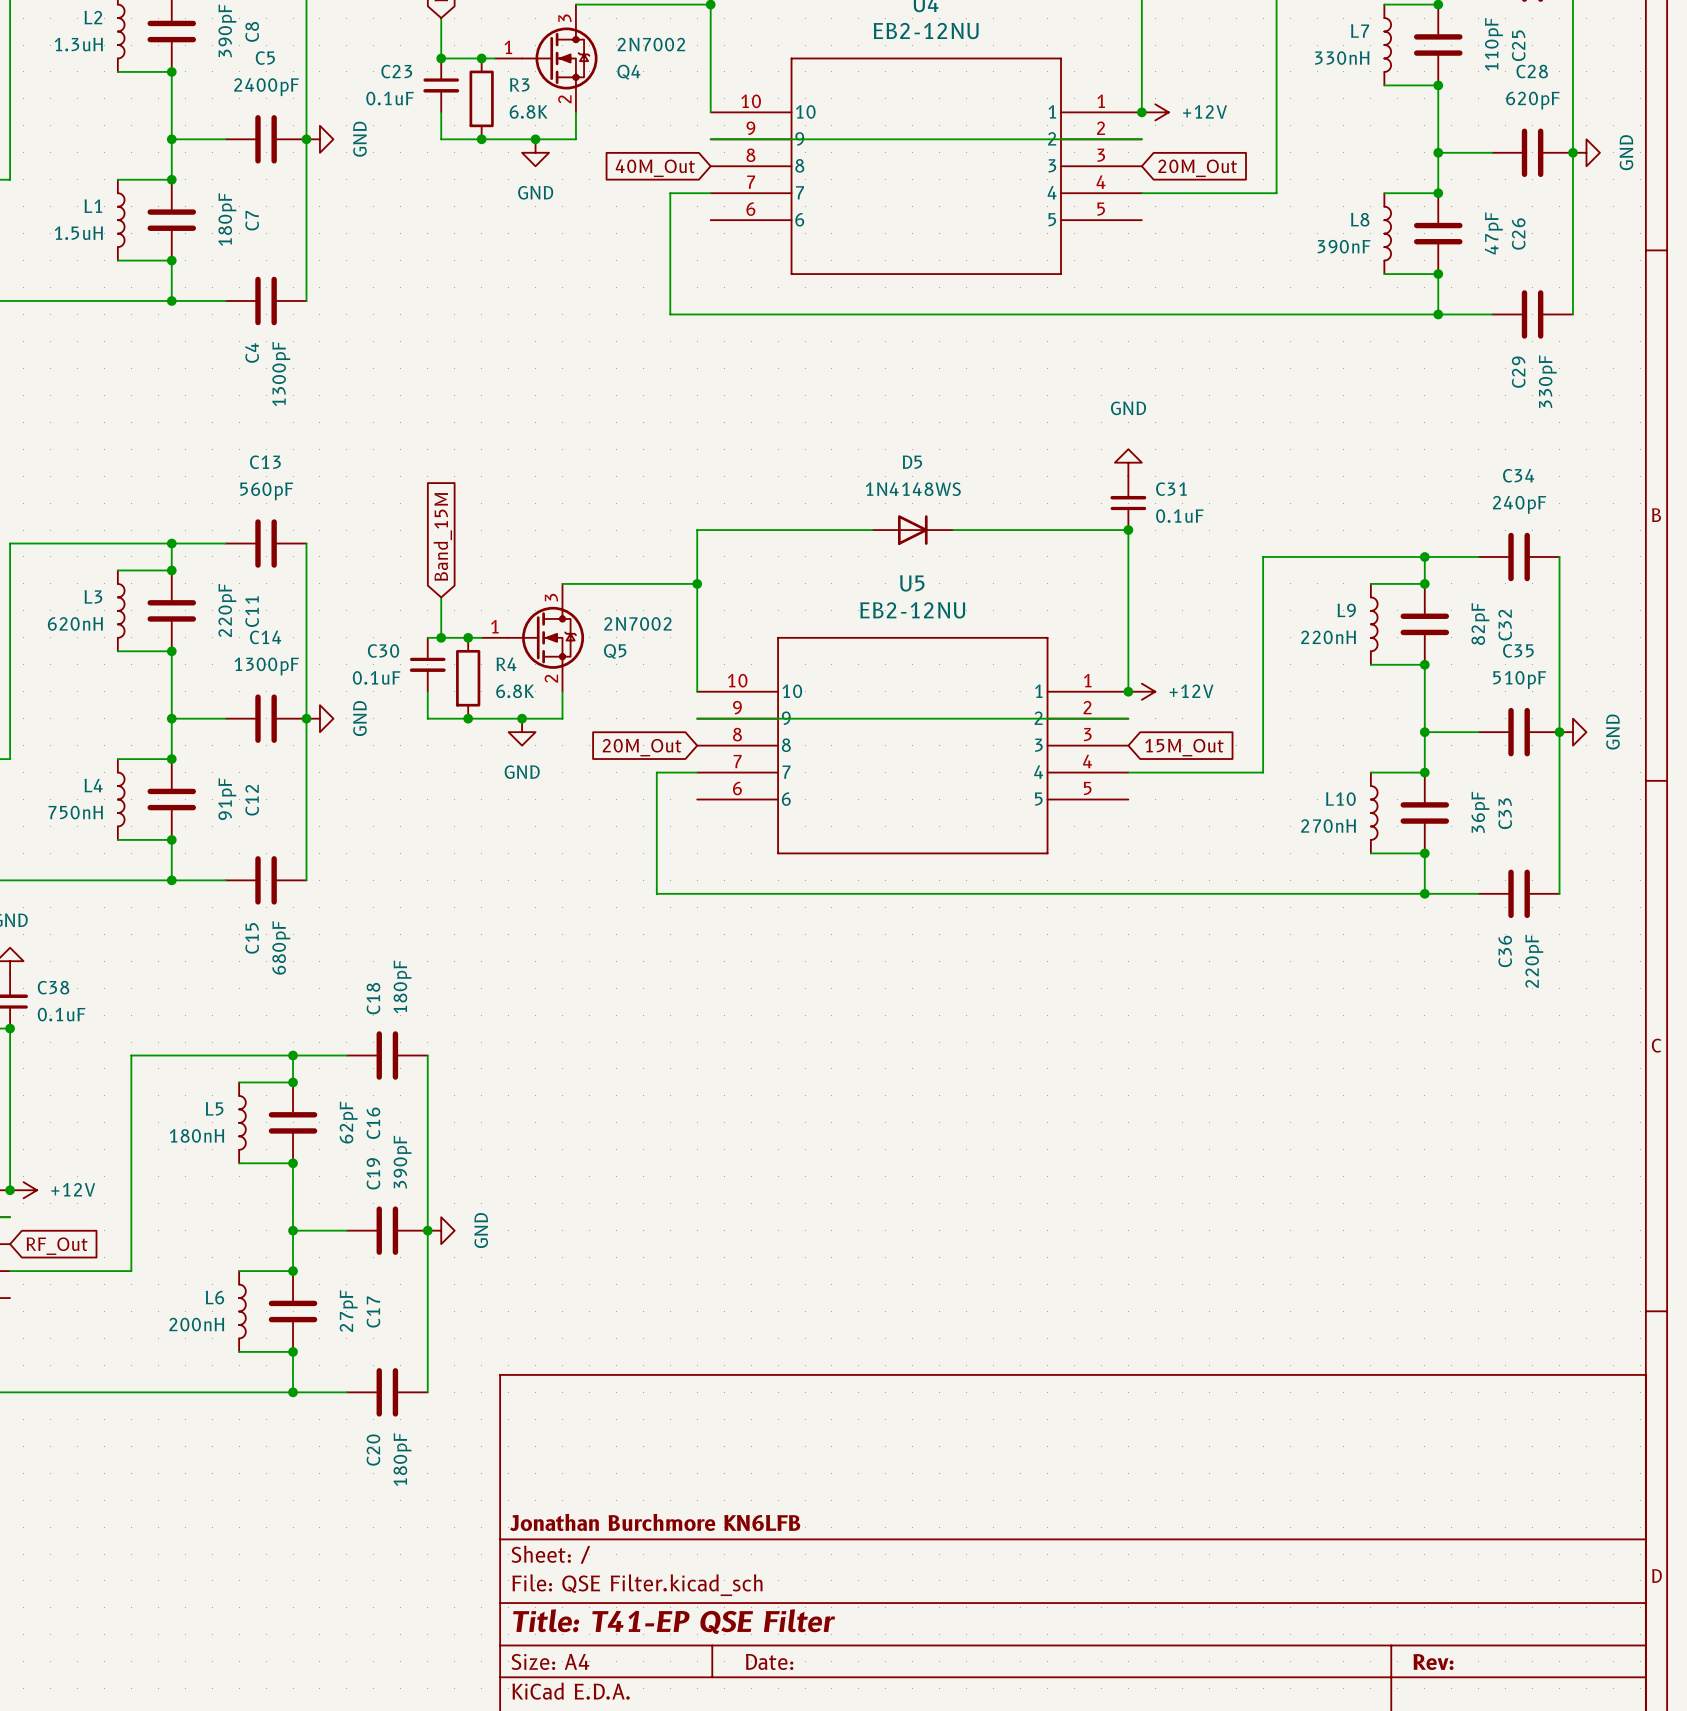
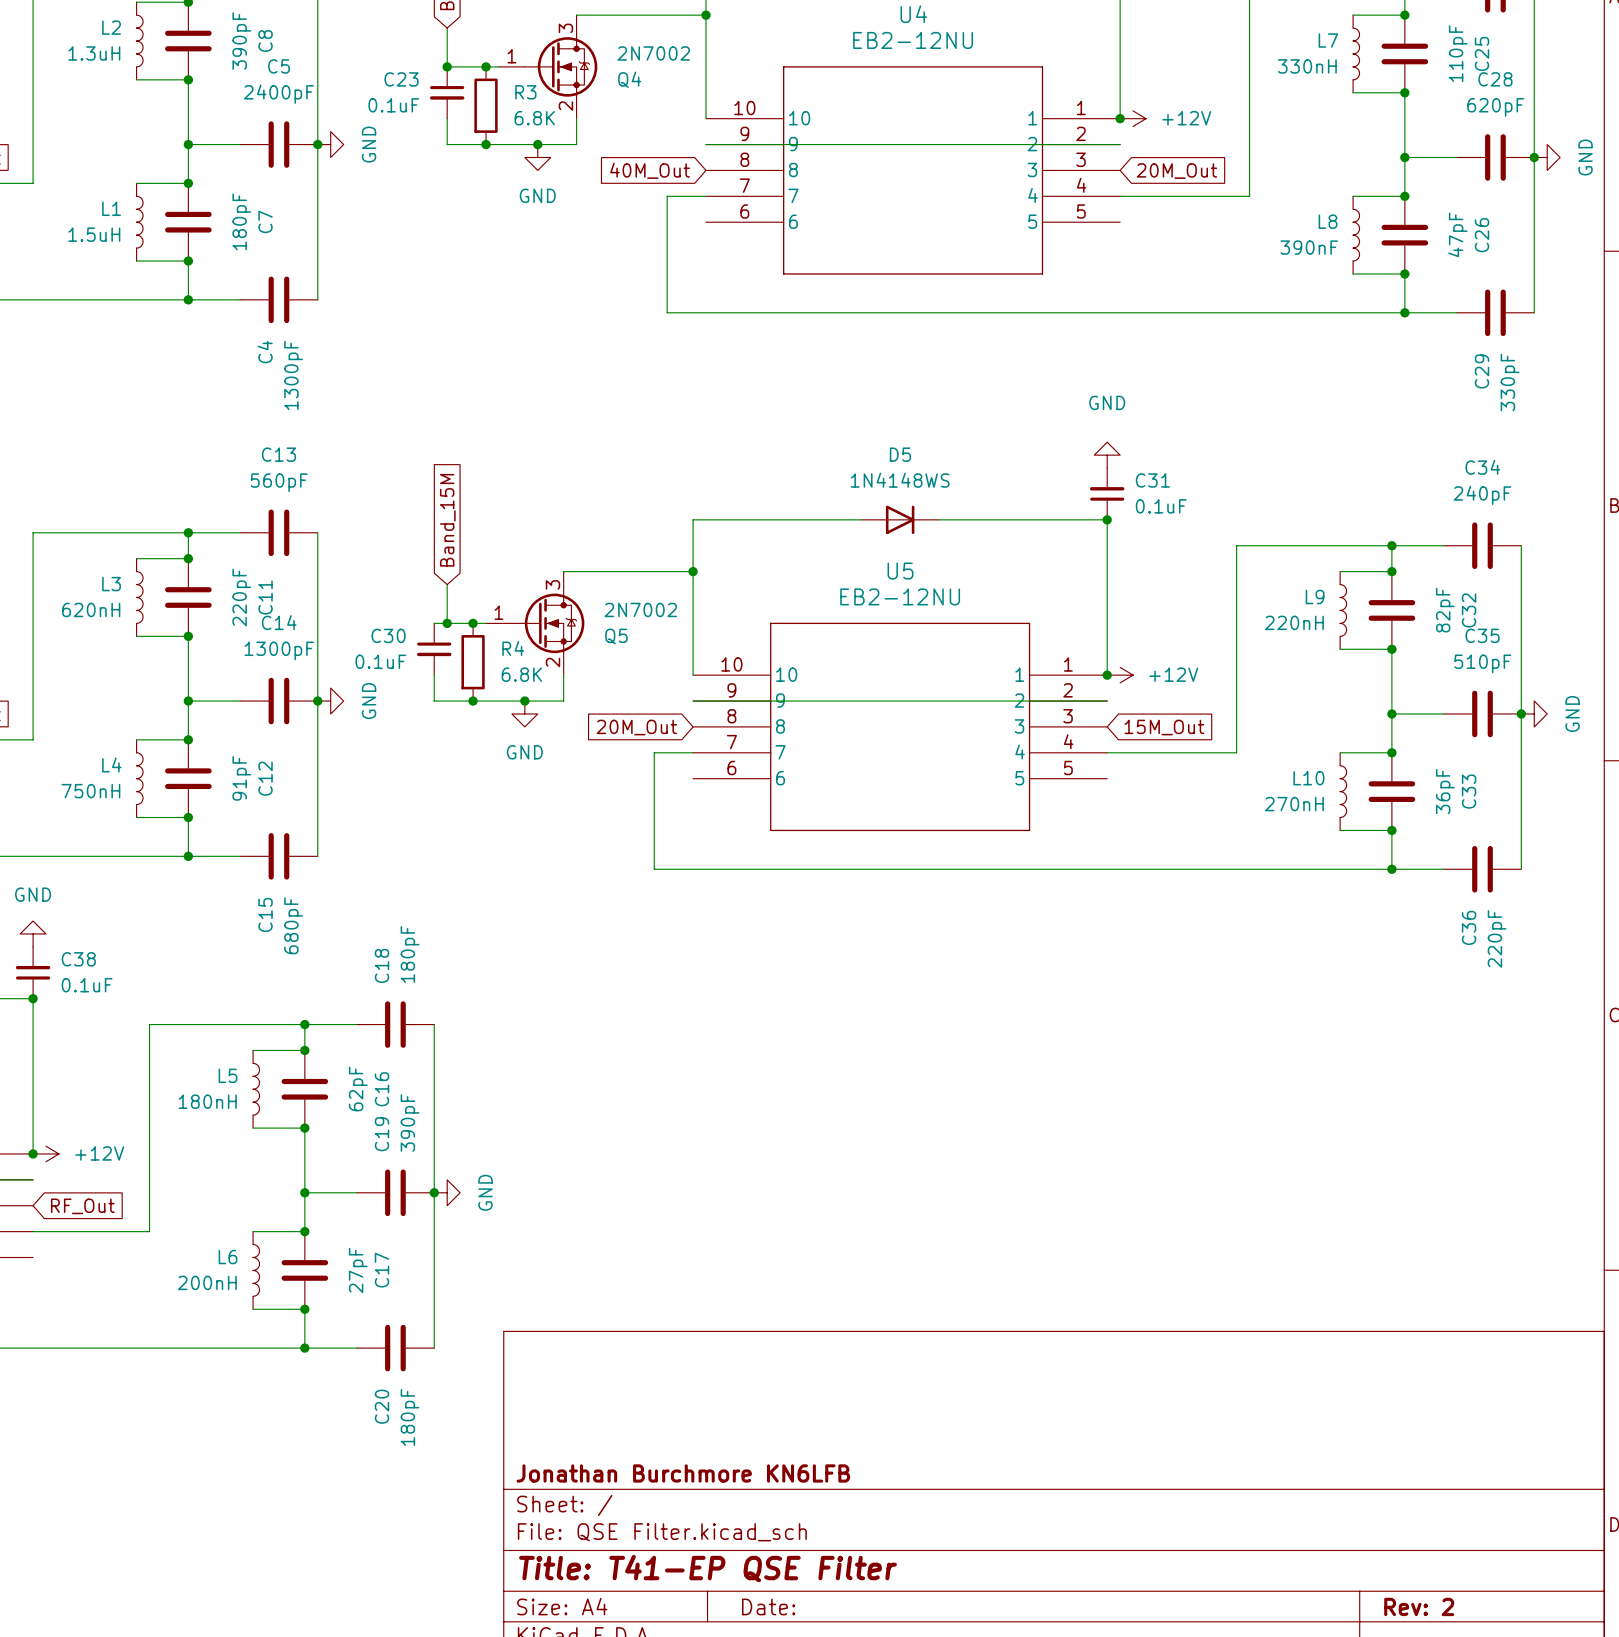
title block: Rev: (1433, 1662) -> Rev: 2 (1419, 1606)

